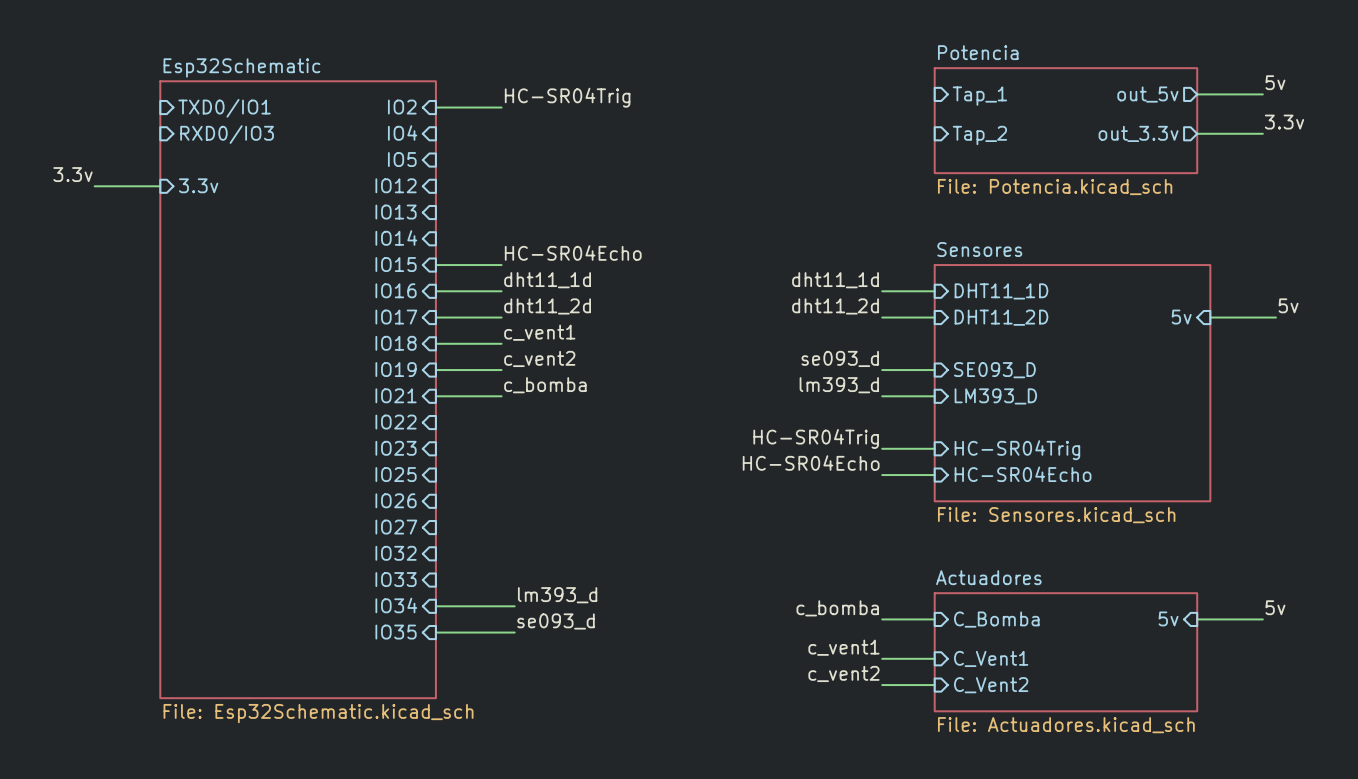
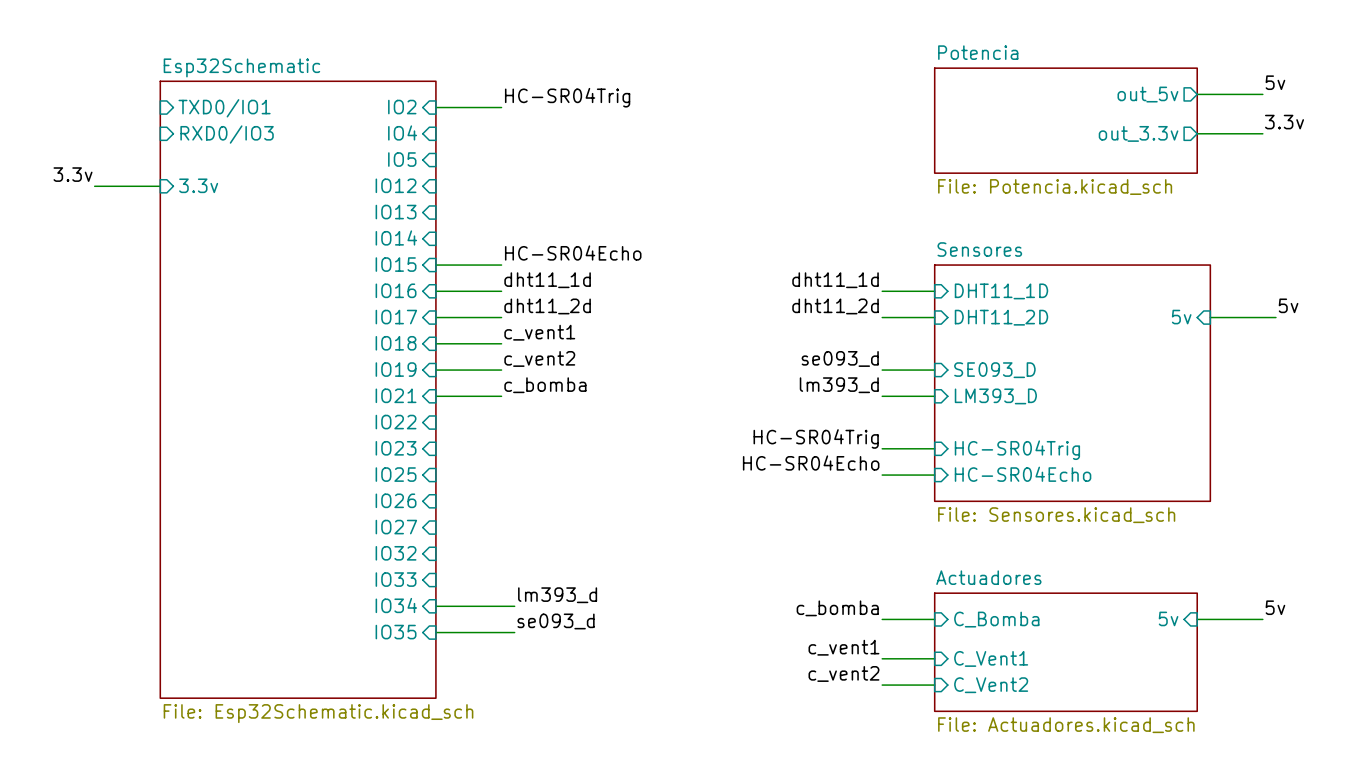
sheet pin: Tap_1 (979, 96) -> none
sheet pin: Tap_2 (979, 135) -> none

